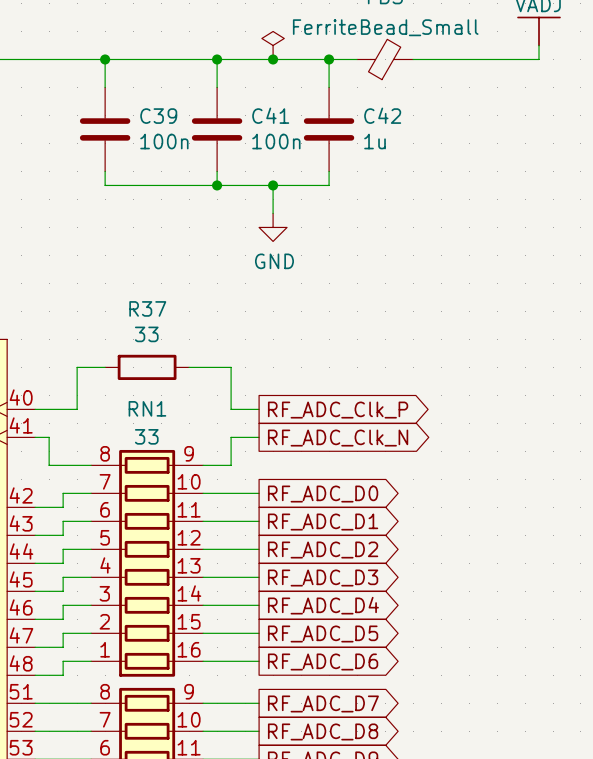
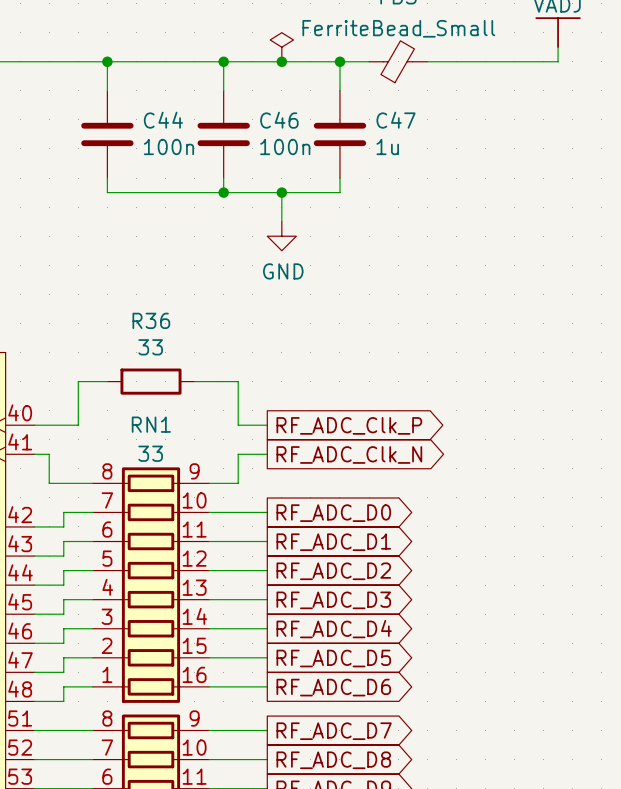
C41 name: C41 (270, 115) -> C46 (279, 120)
C42 name: C42 (382, 115) -> C47 (396, 120)
C39 name: C39 (158, 116) -> C44 (163, 120)
R37 name: R37 (147, 308) -> R36 (151, 320)

